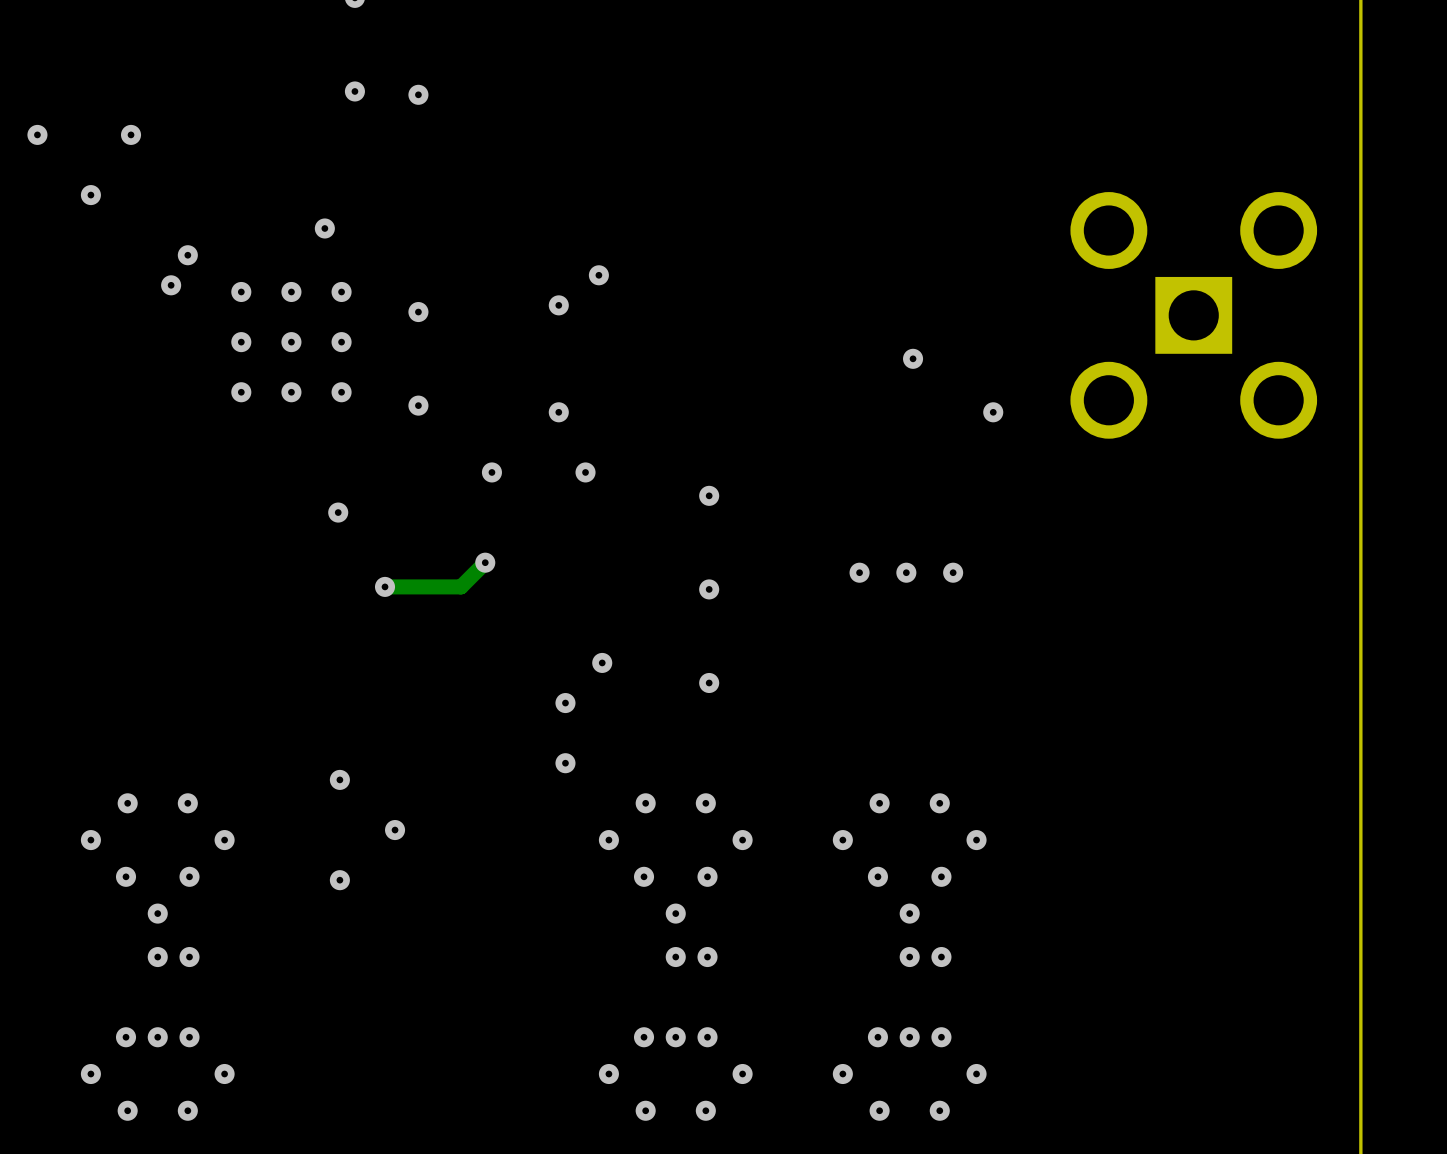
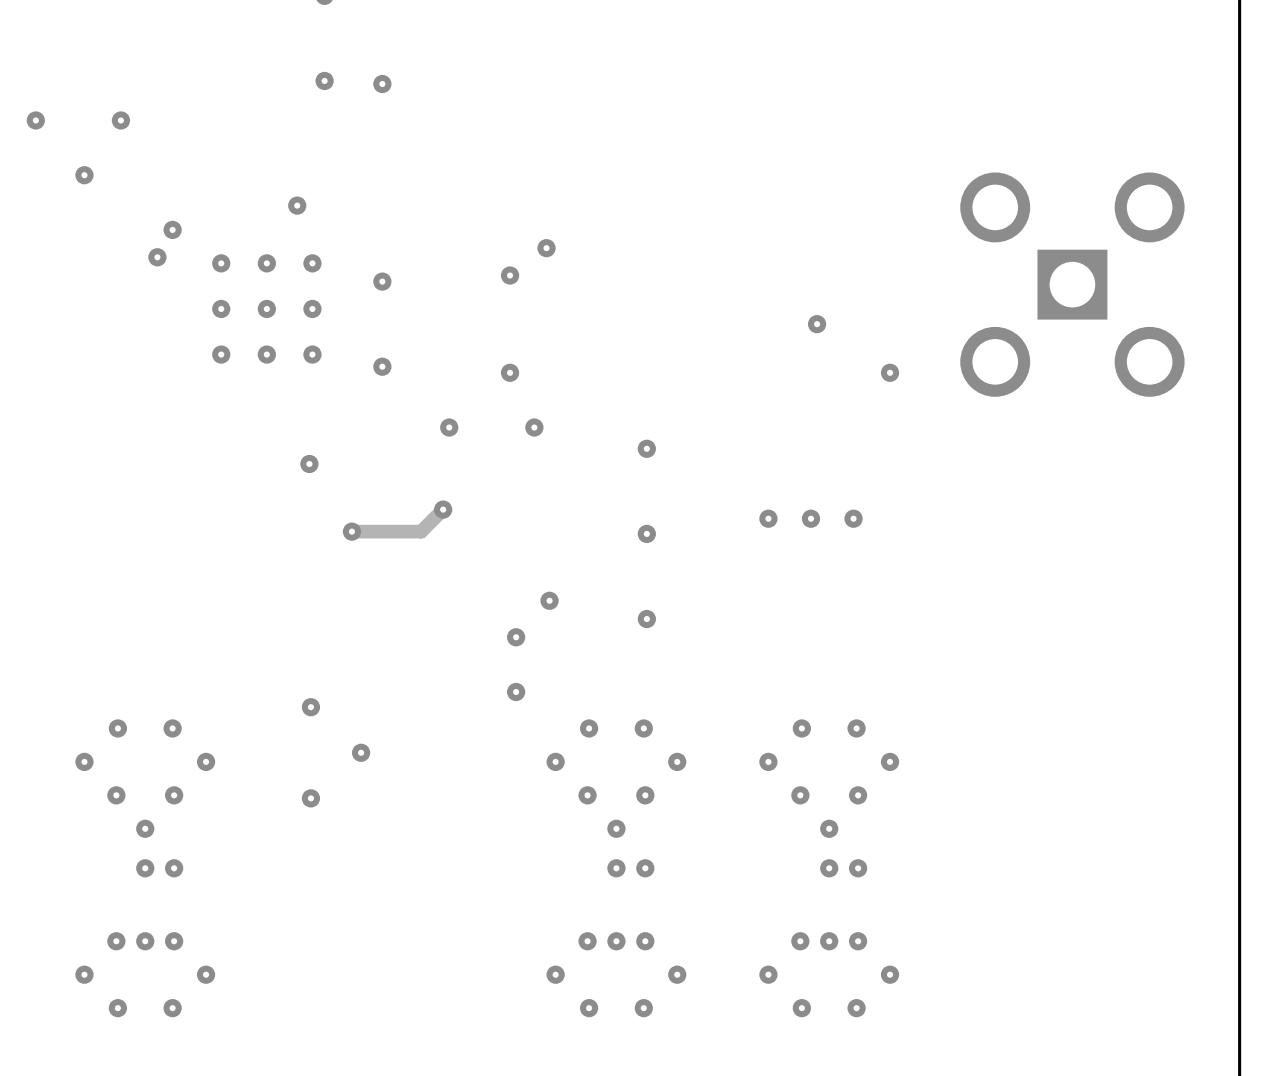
part position: (1193, 315) -> (1072, 284)
via position: (913, 358) -> (817, 324)
via position: (993, 412) -> (890, 372)
via position: (859, 572) -> (768, 518)
via position: (906, 572) -> (810, 518)
via position: (953, 572) -> (853, 518)

